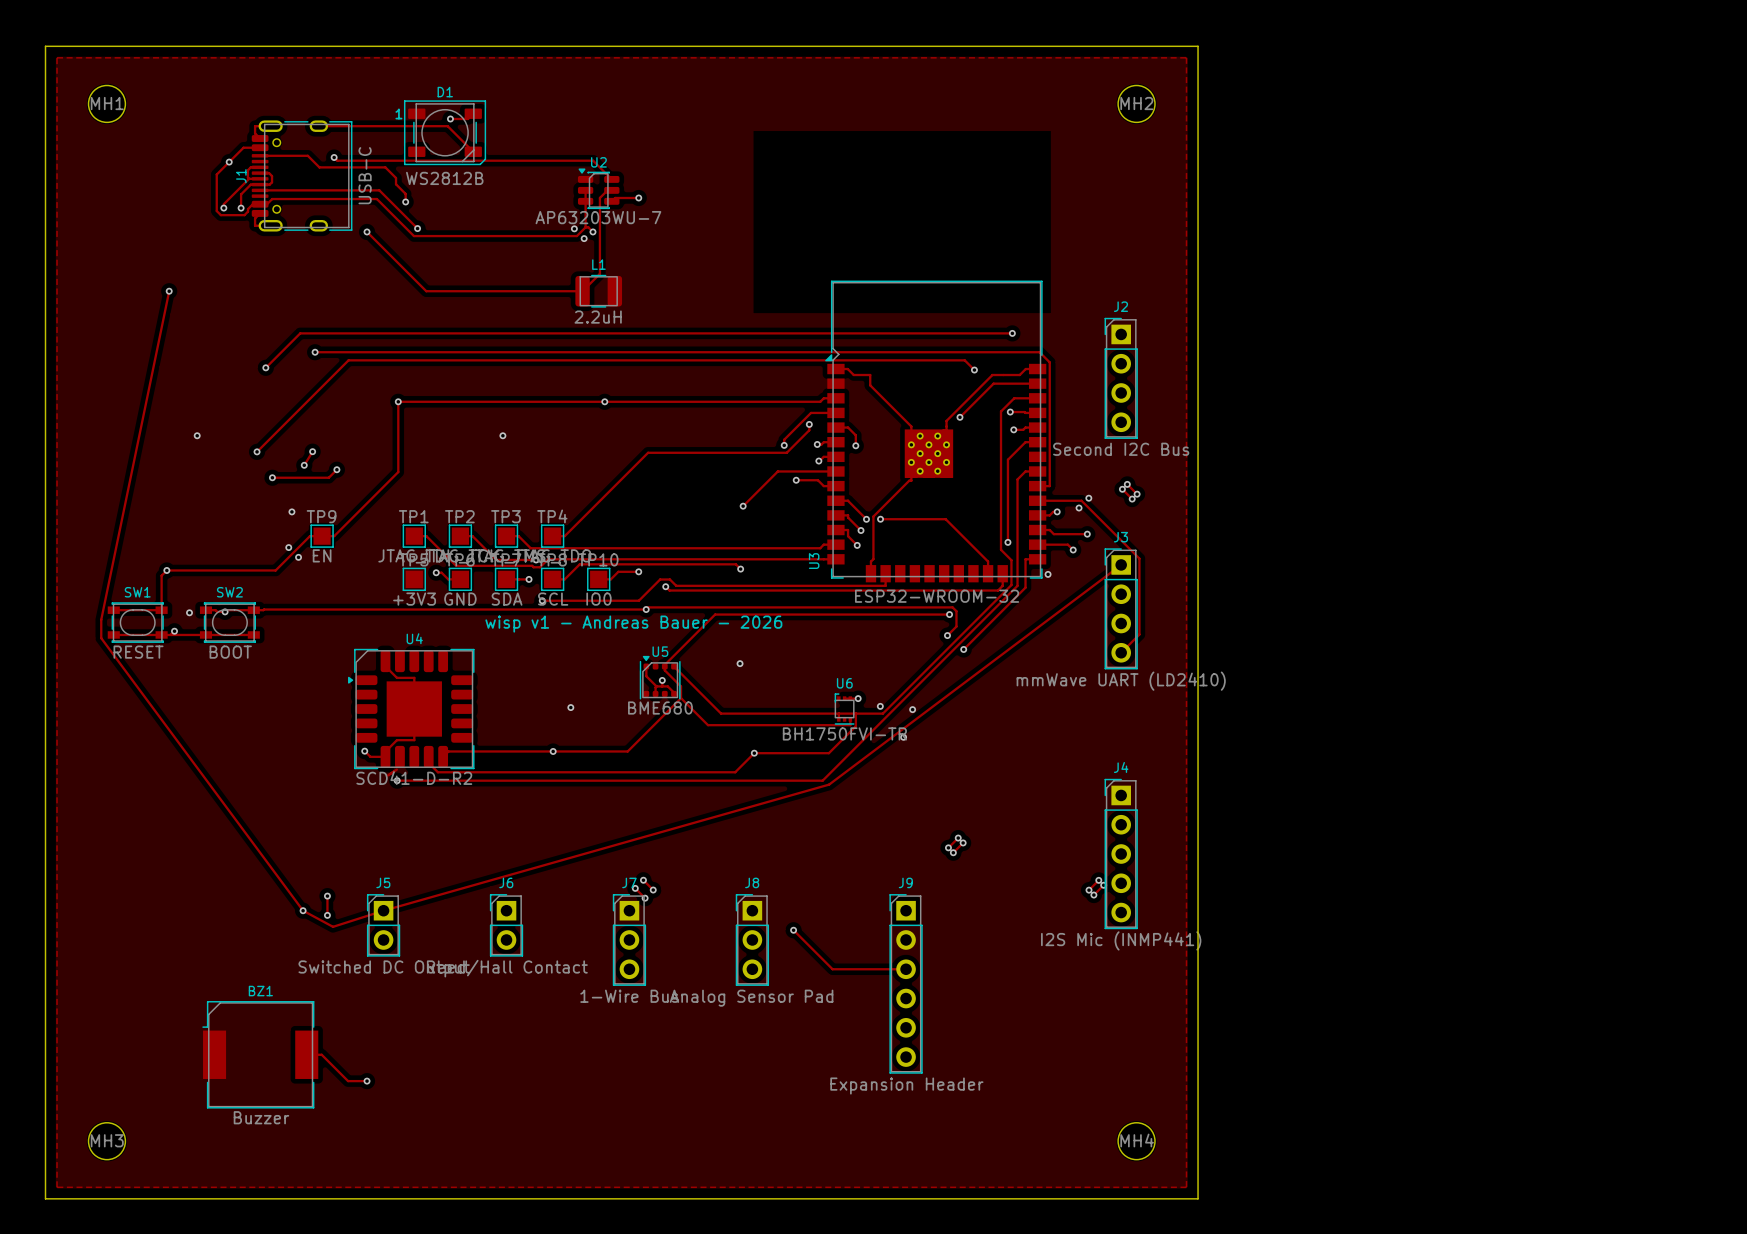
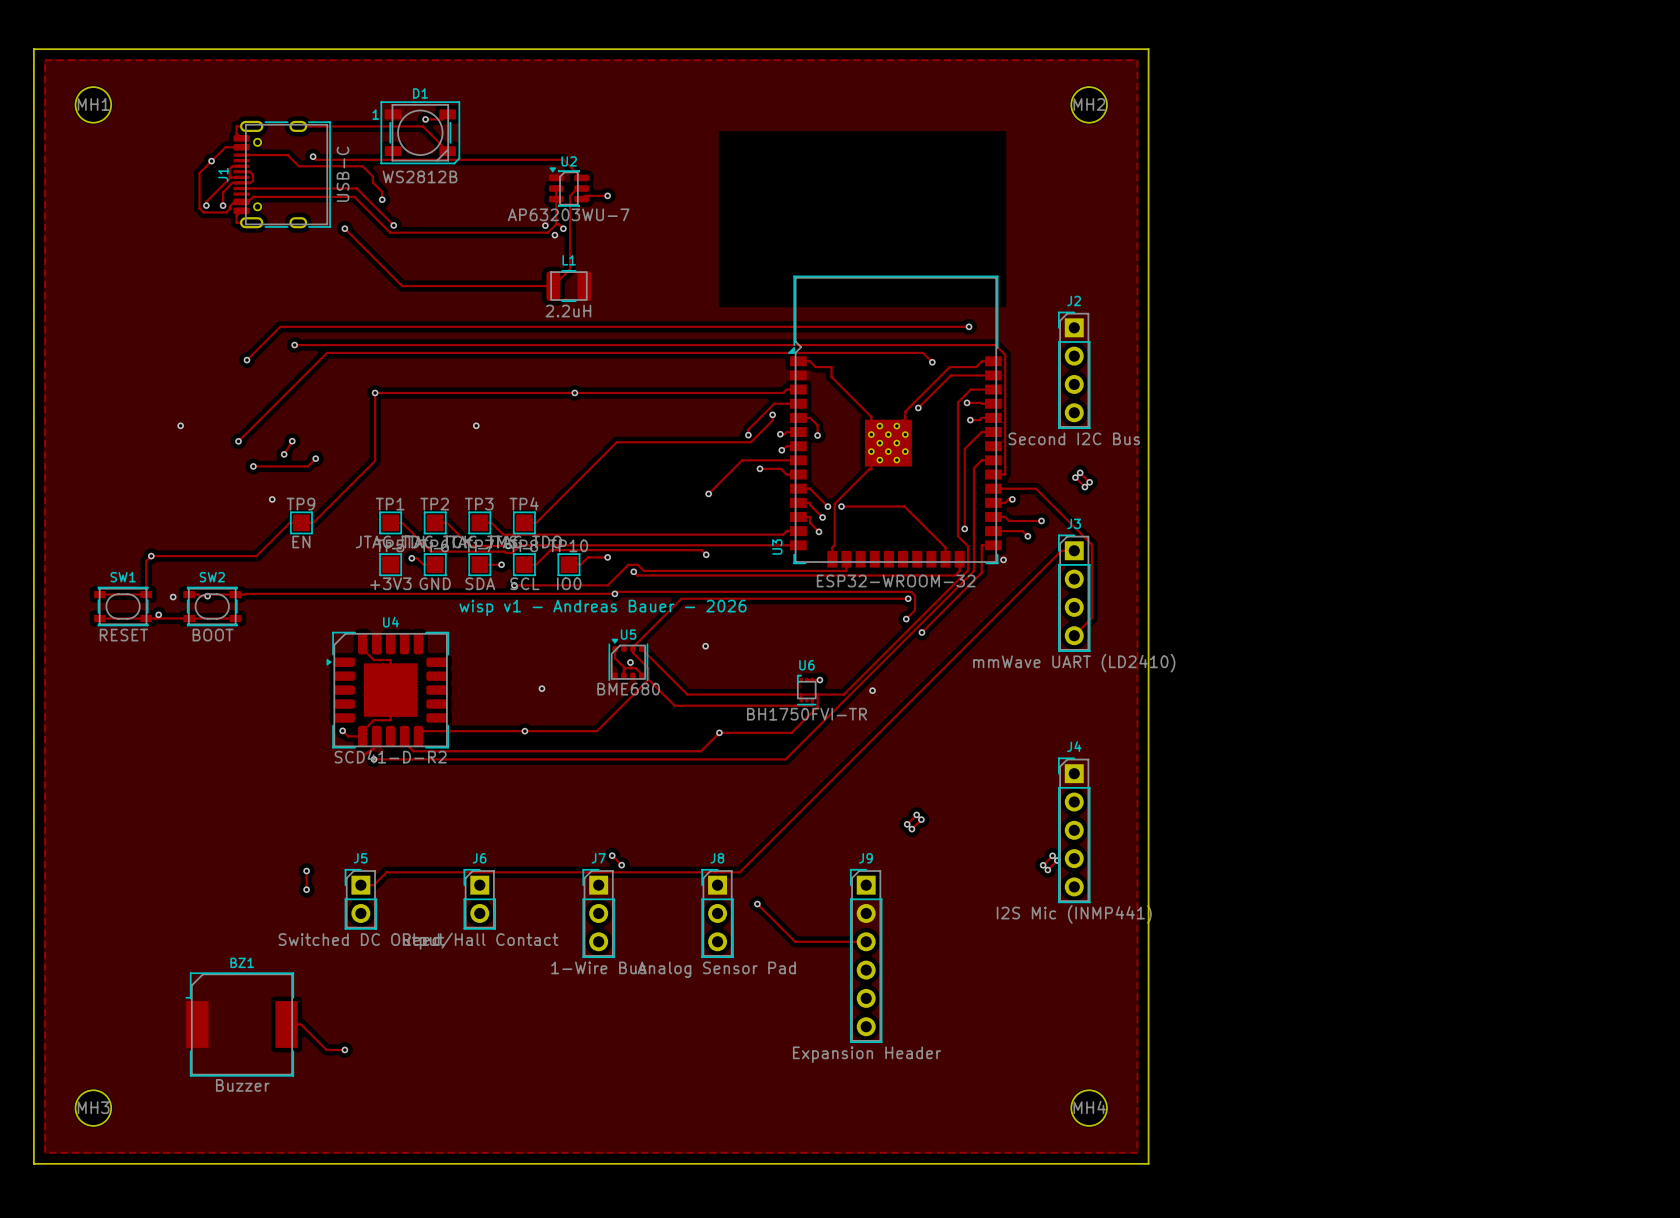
track: (169, 291) (101, 619) (101, 638) (303, 910) (333, 926) (383, 910) (829, 784) (1121, 564) -> (360, 885) (373, 885) (386, 872) (739, 872) (1061, 550) (1074, 550)
via: (169, 291) -> none
via: (1088, 498) -> none
via: (1079, 508) -> none
via: (288, 547) -> none
via: (298, 557) -> none
via: (880, 706) -> none
via: (903, 737) -> none
track: (635, 888) (645, 898) -> none
via: (635, 888) -> none
via: (645, 898) -> none
via: (303, 910) -> none

